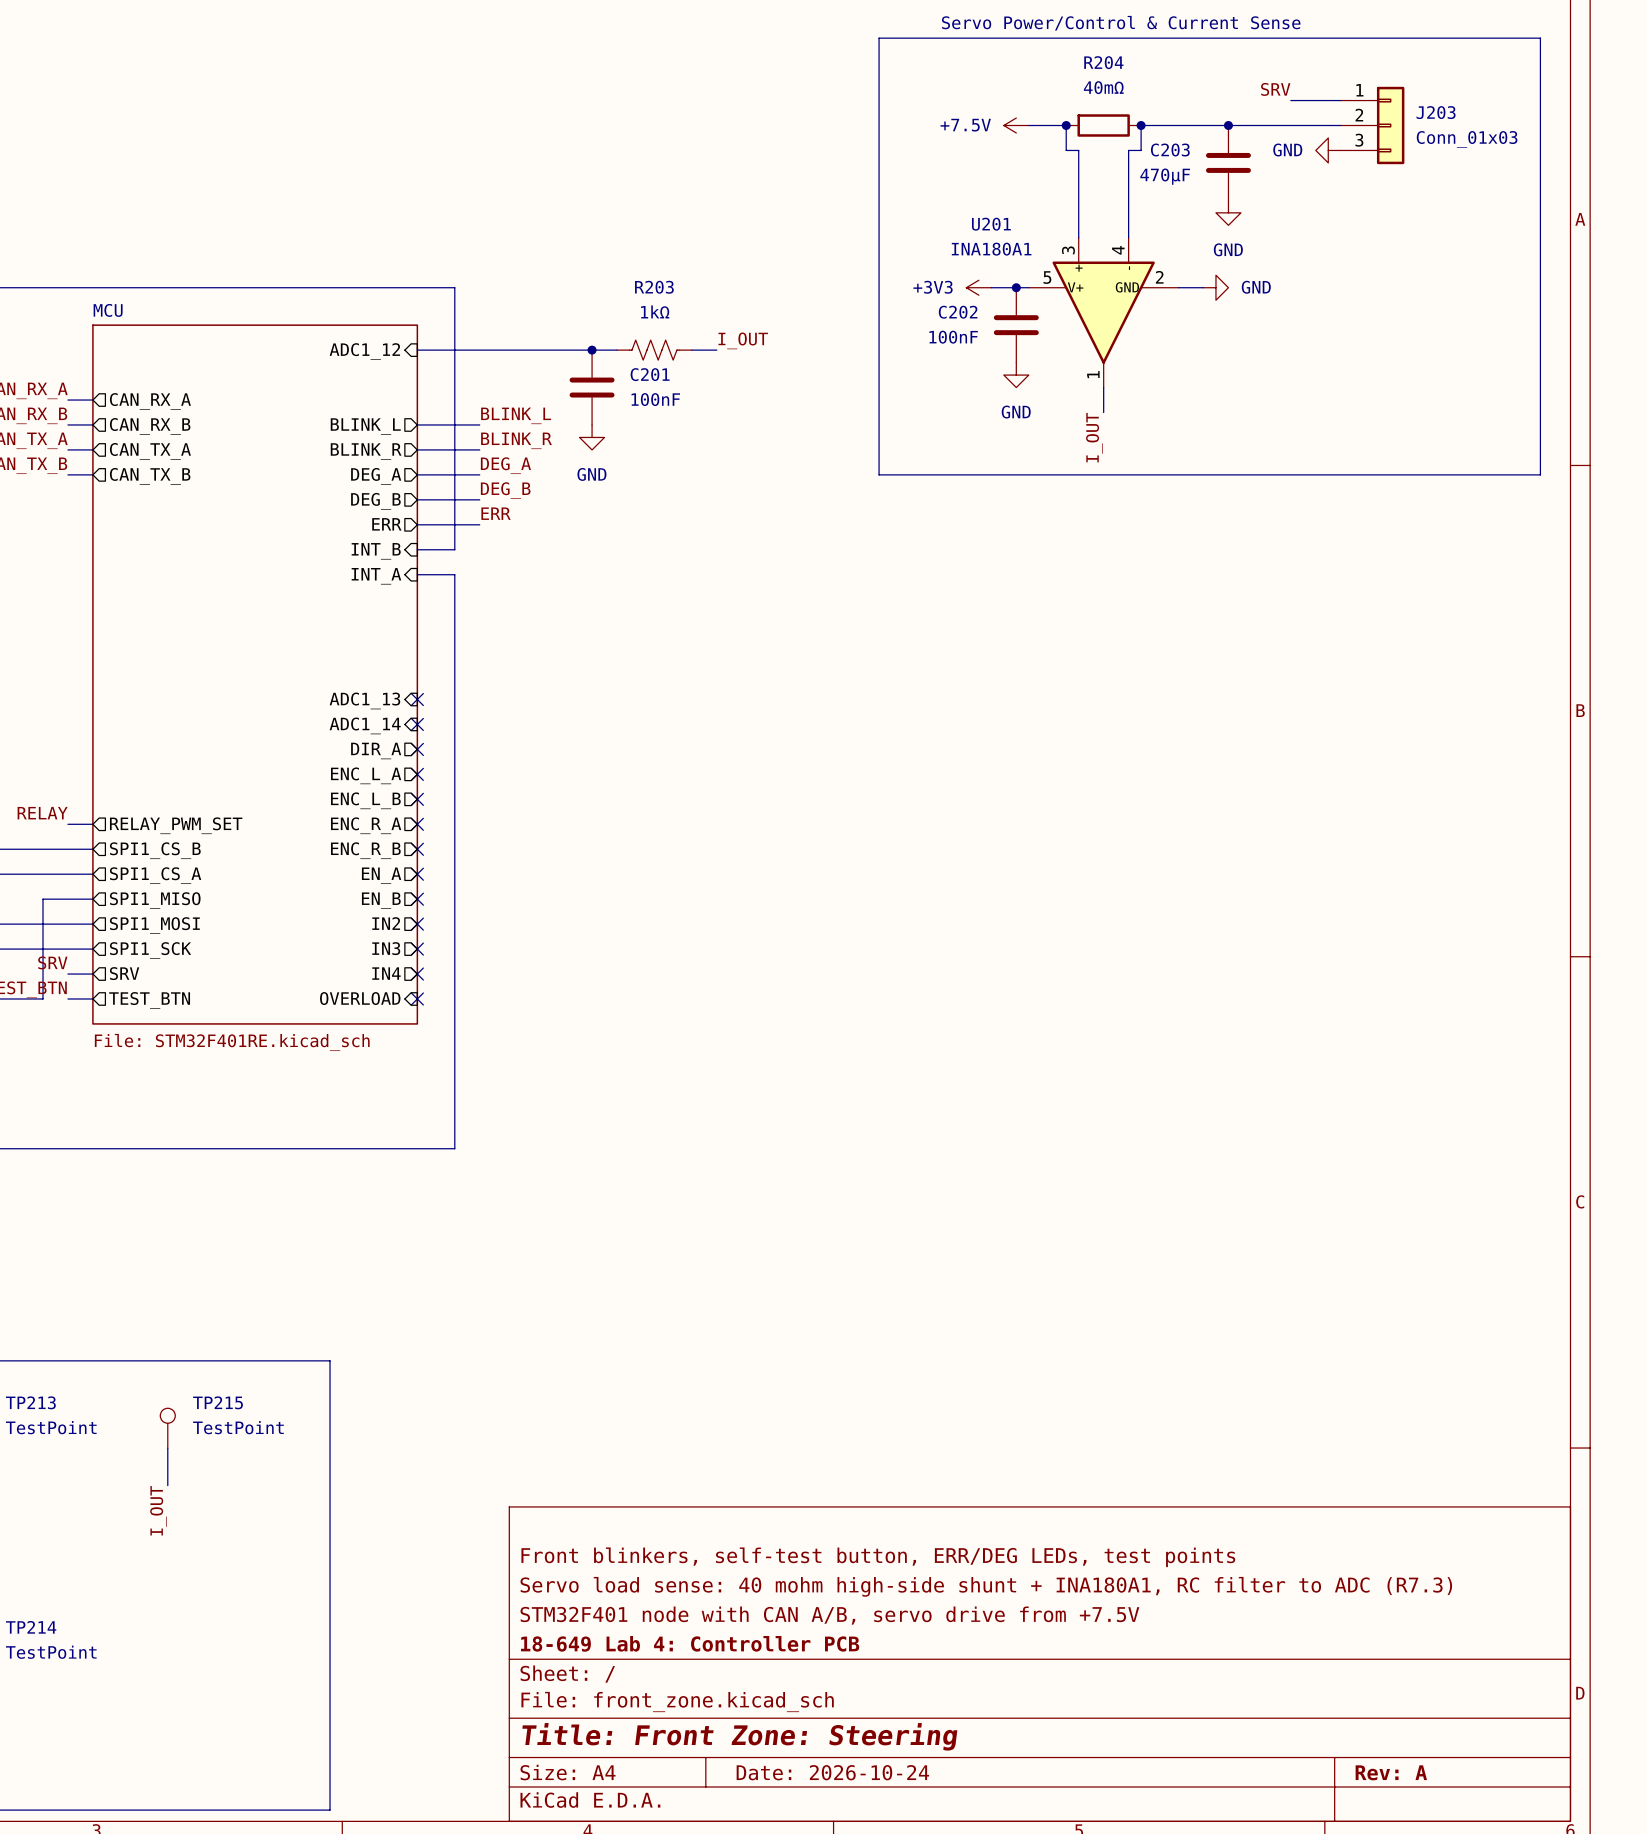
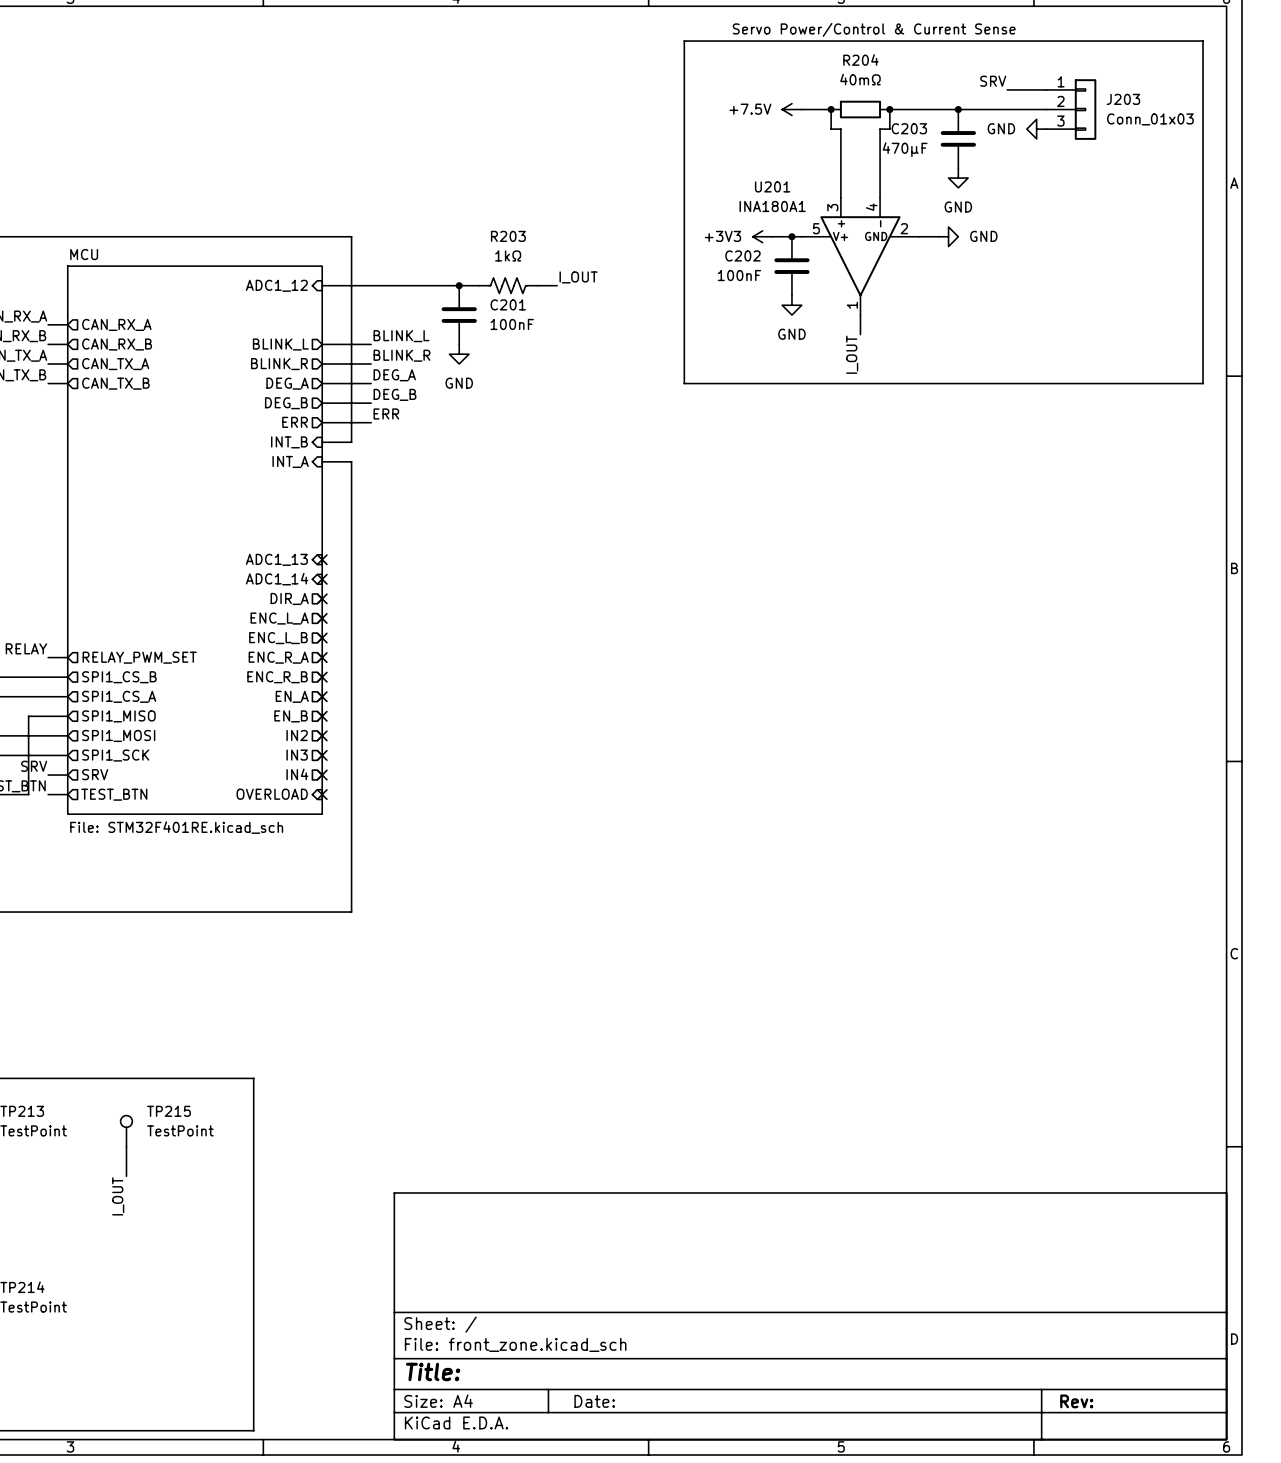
title block: Front blinkers, self-test button, ERR/DEG LEDs, test points (878, 1557) -> none
title block: Servo load sense: 40 mohm high-side shunt + INA180A1, RC filter to ADC (R7.3) (986, 1586) -> none
title block: STM32F401 node with CAN A/B, servo drive from +7.5V (829, 1615) -> none
title block: 18-649 Lab 4: Controller PCB (690, 1643) -> none
title block: Title: Front Zone: Steering (739, 1736) -> Title: (433, 1371)
title block: Date: 2026-10-24 (832, 1772) -> Date: (594, 1401)
title block: Rev: A (1391, 1772) -> Rev: (1076, 1401)

